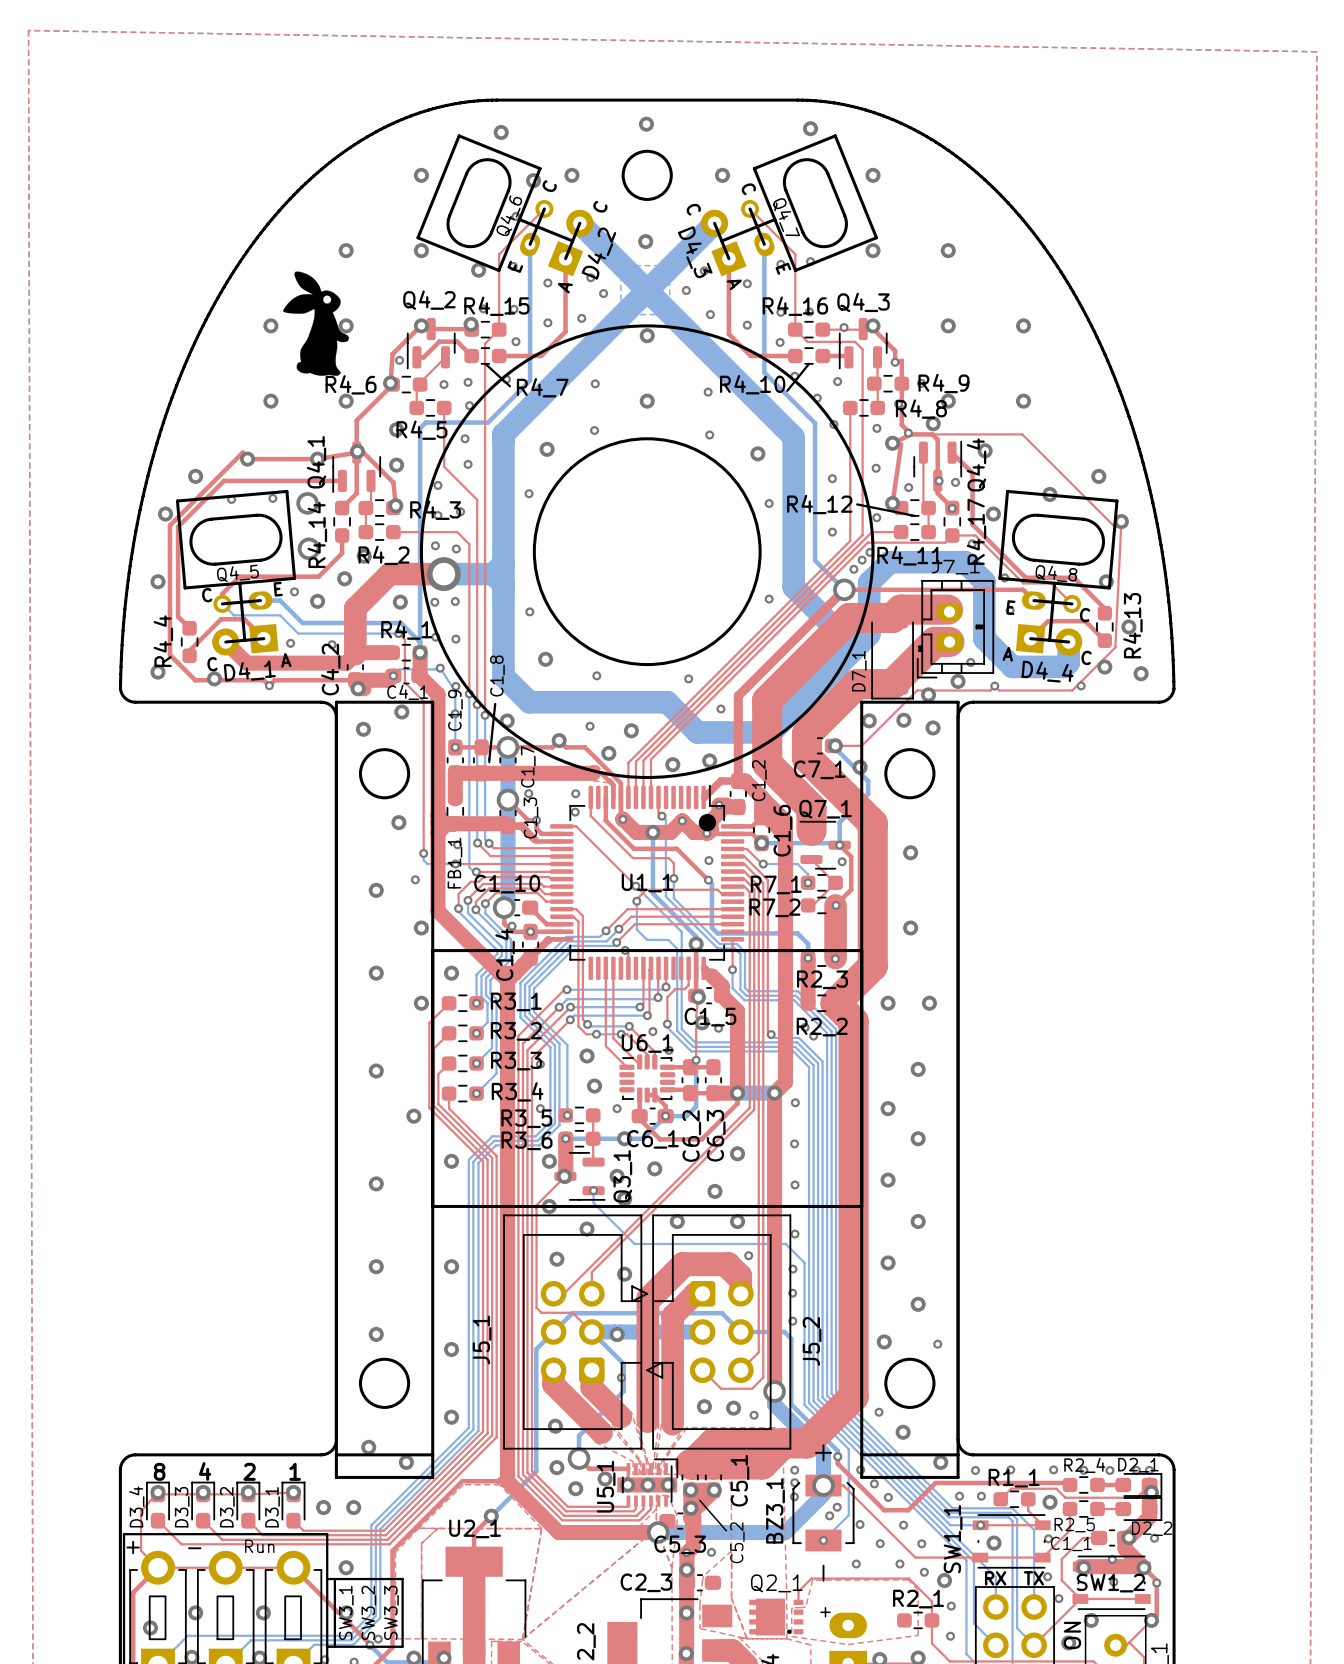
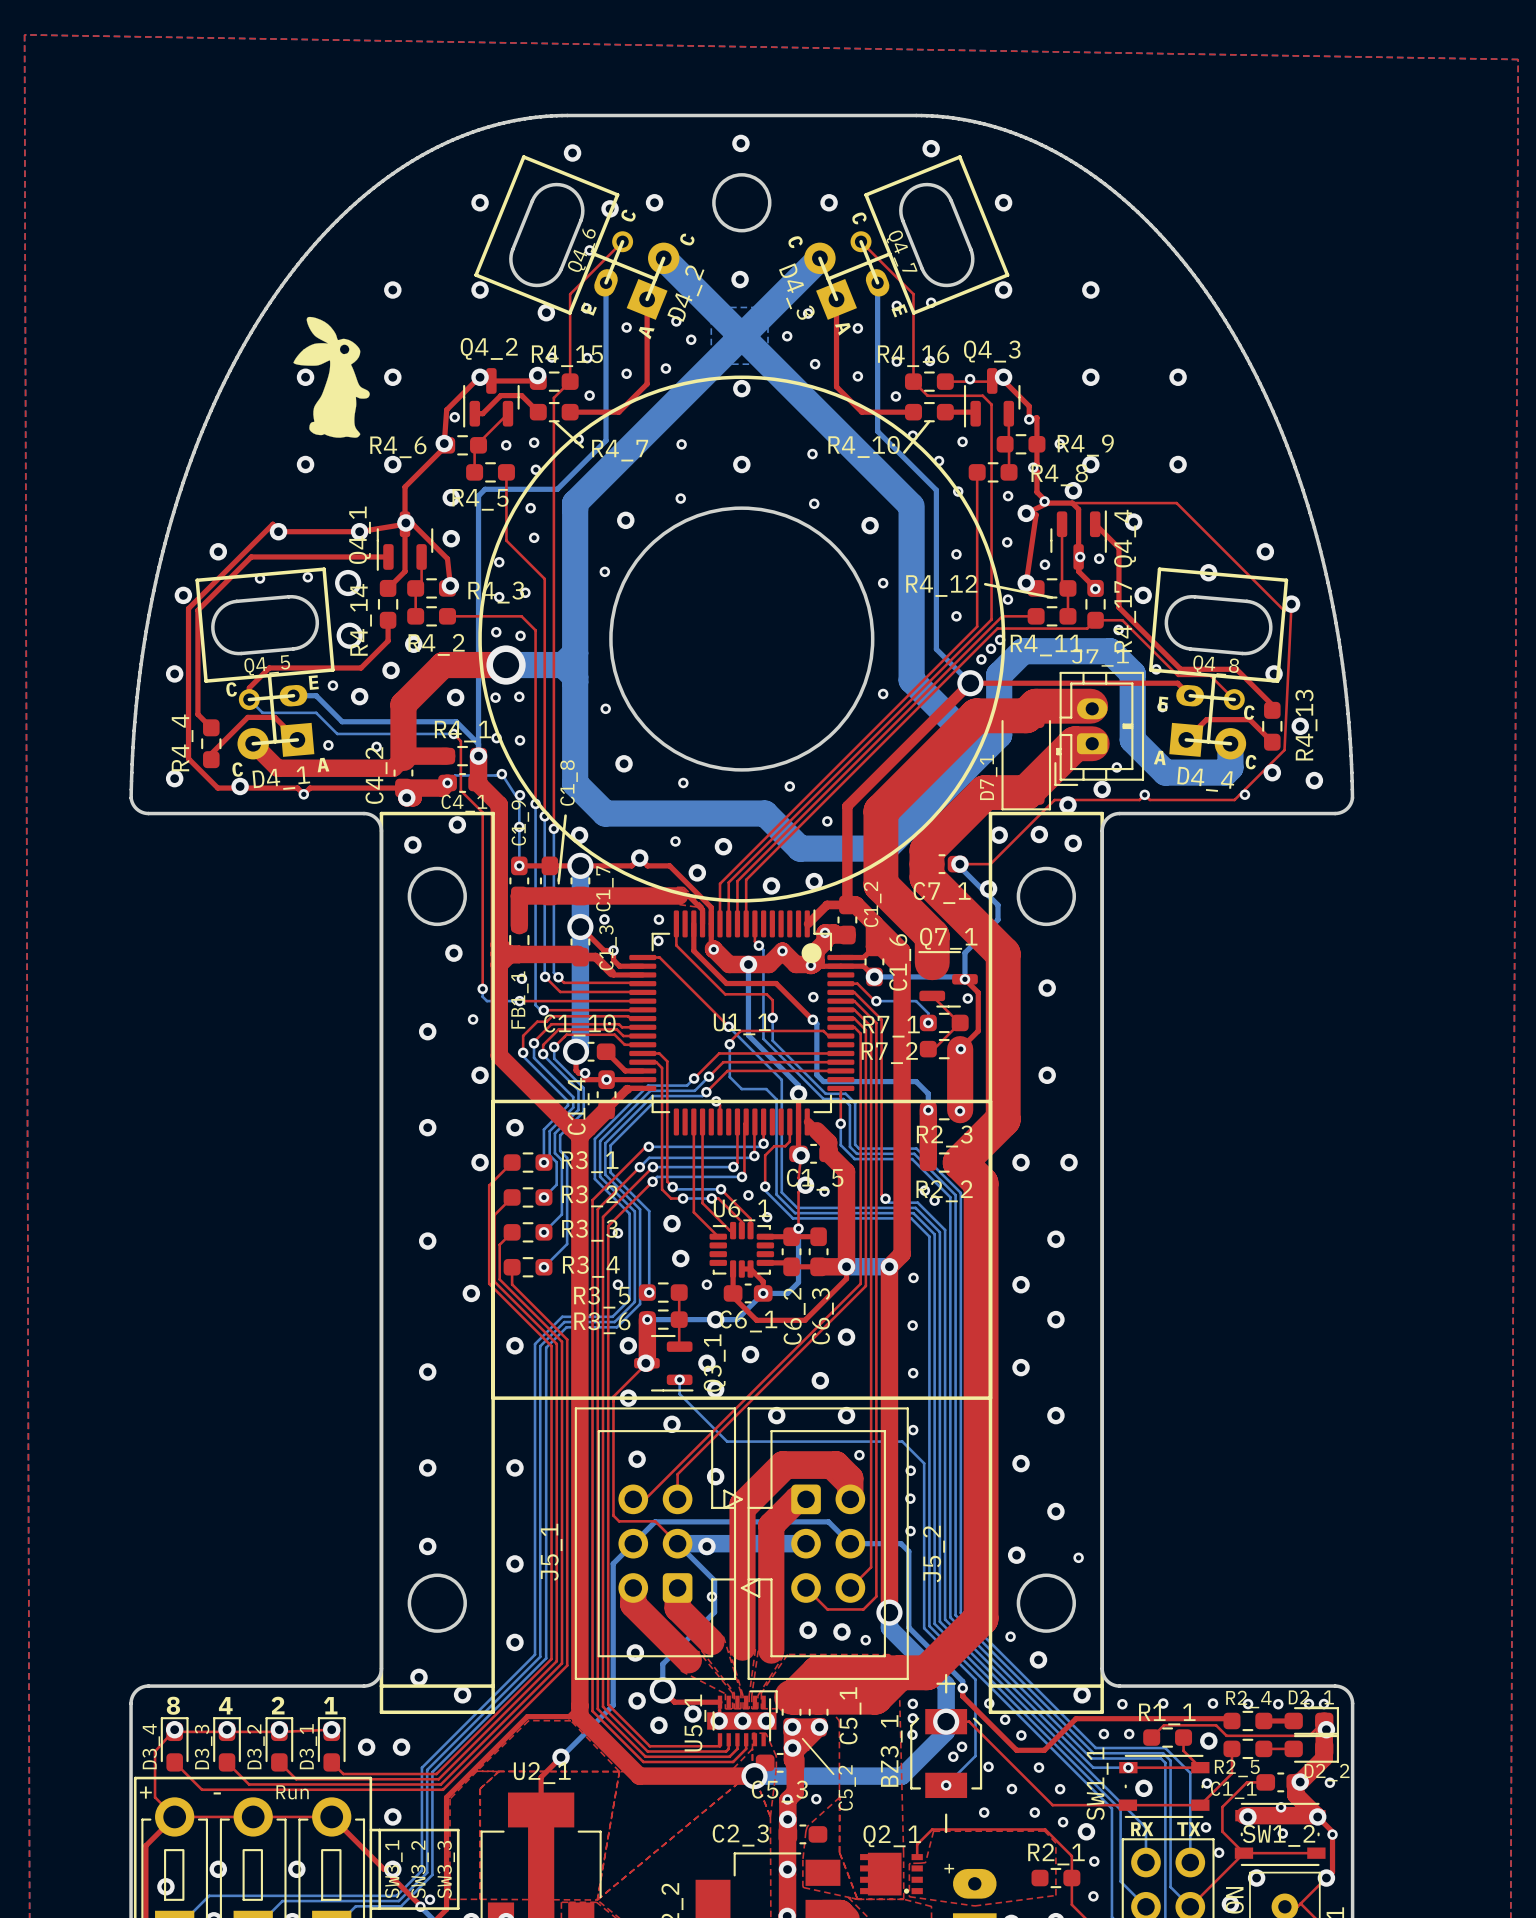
drawing position: (315, 323) -> (331, 377)

